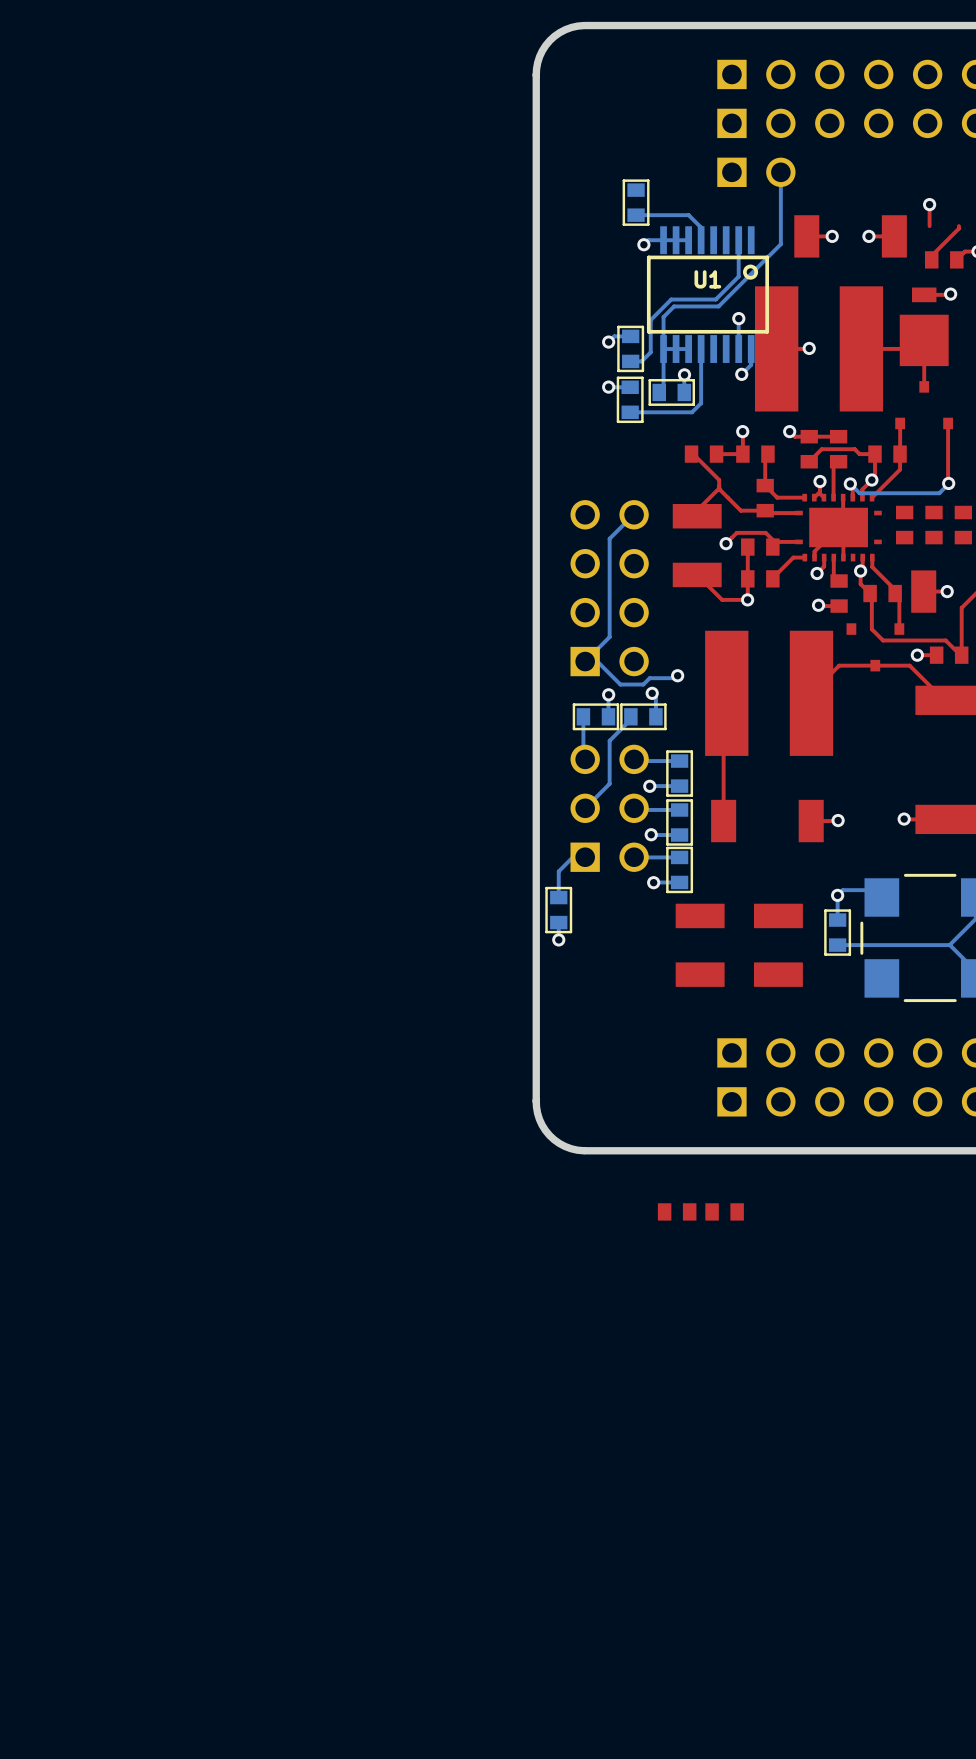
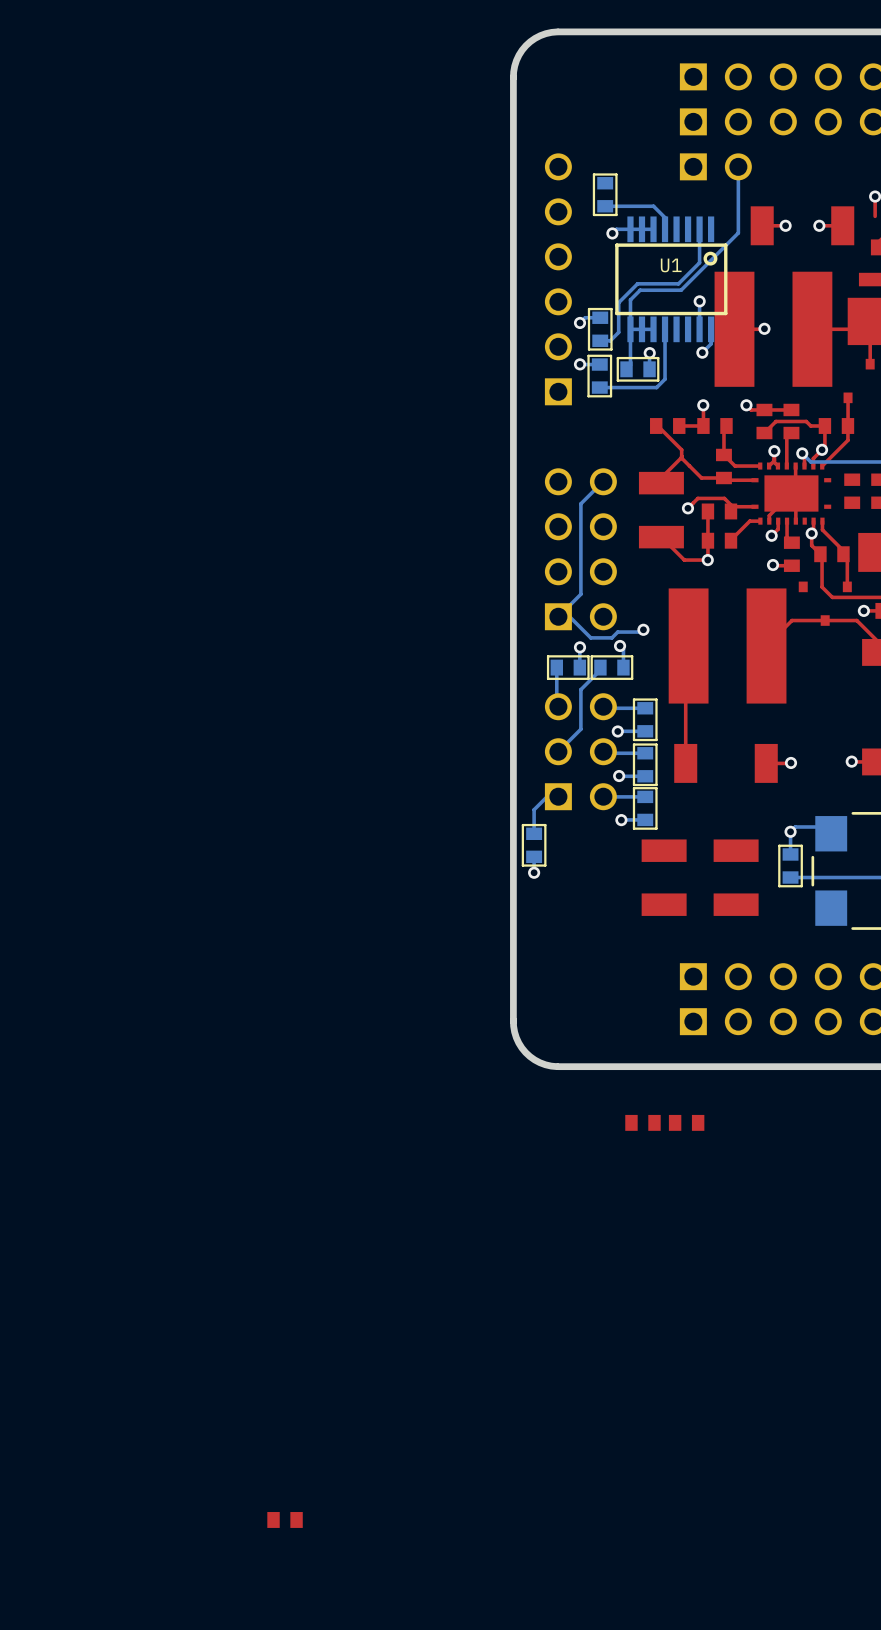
part: none -> (558, 279)
part: none -> (285, 1519)

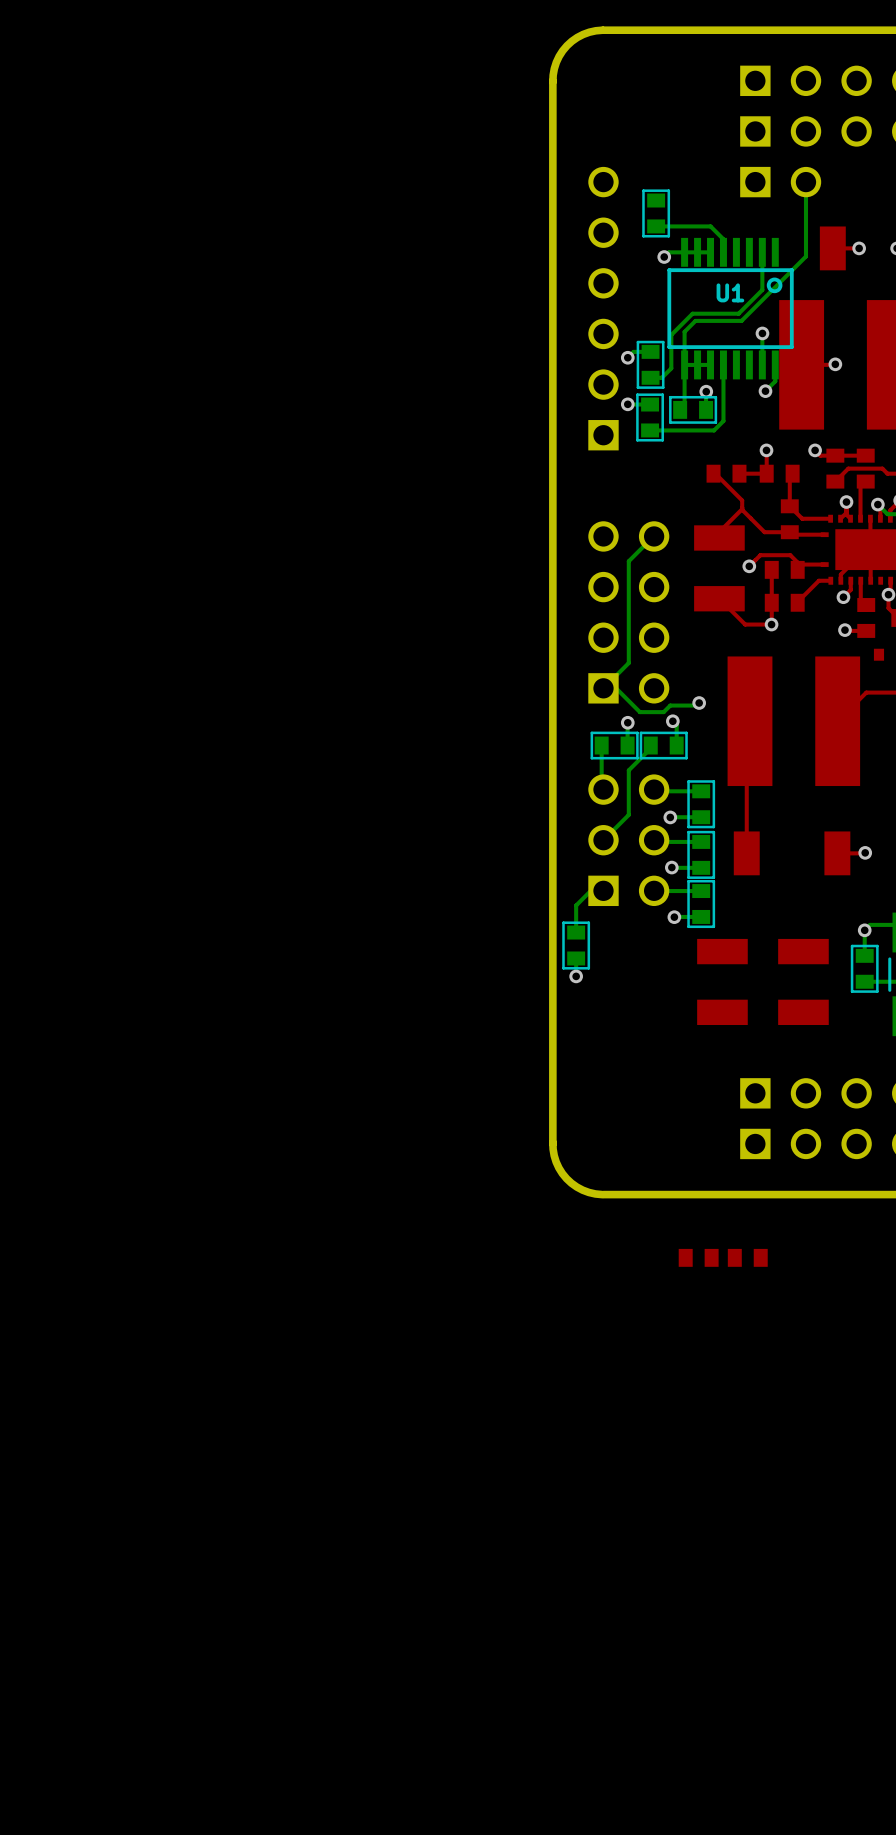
part: (285, 1519) -> none

